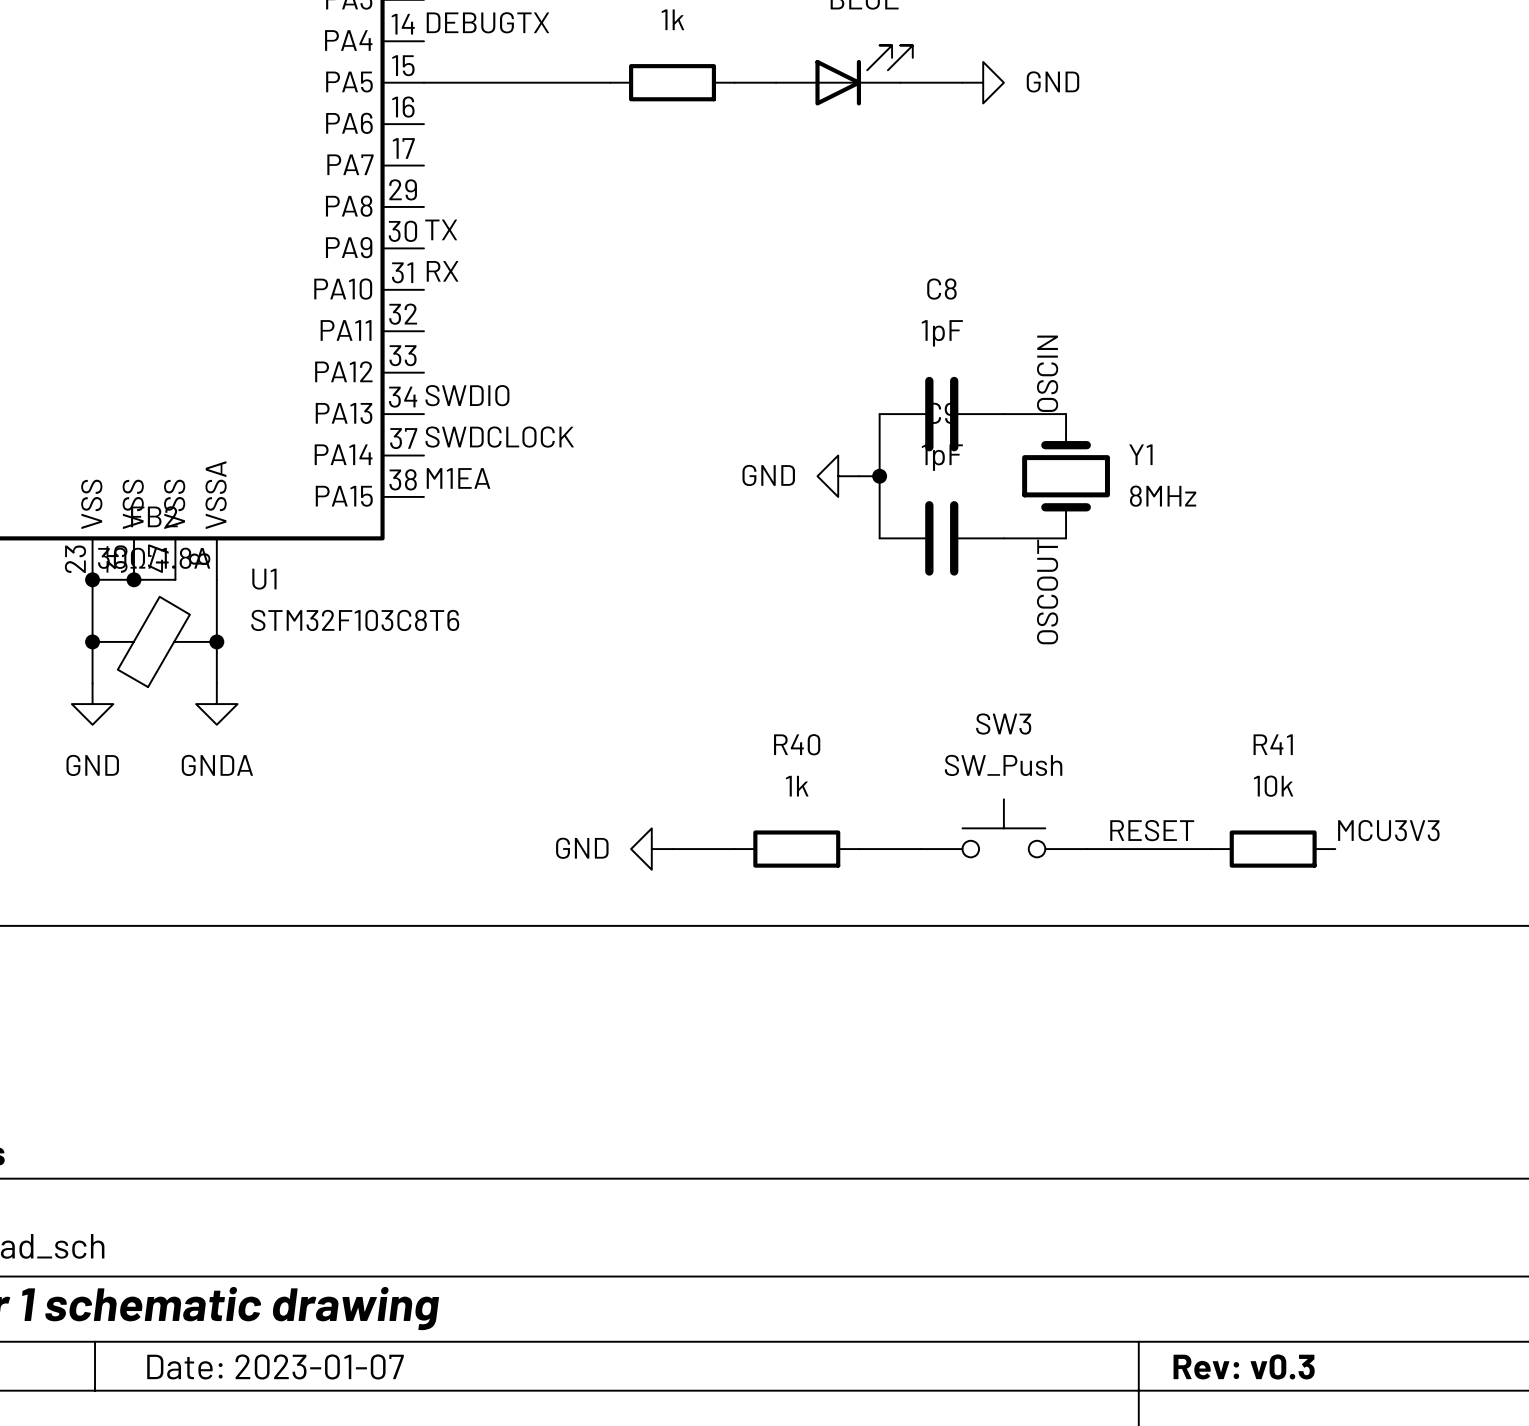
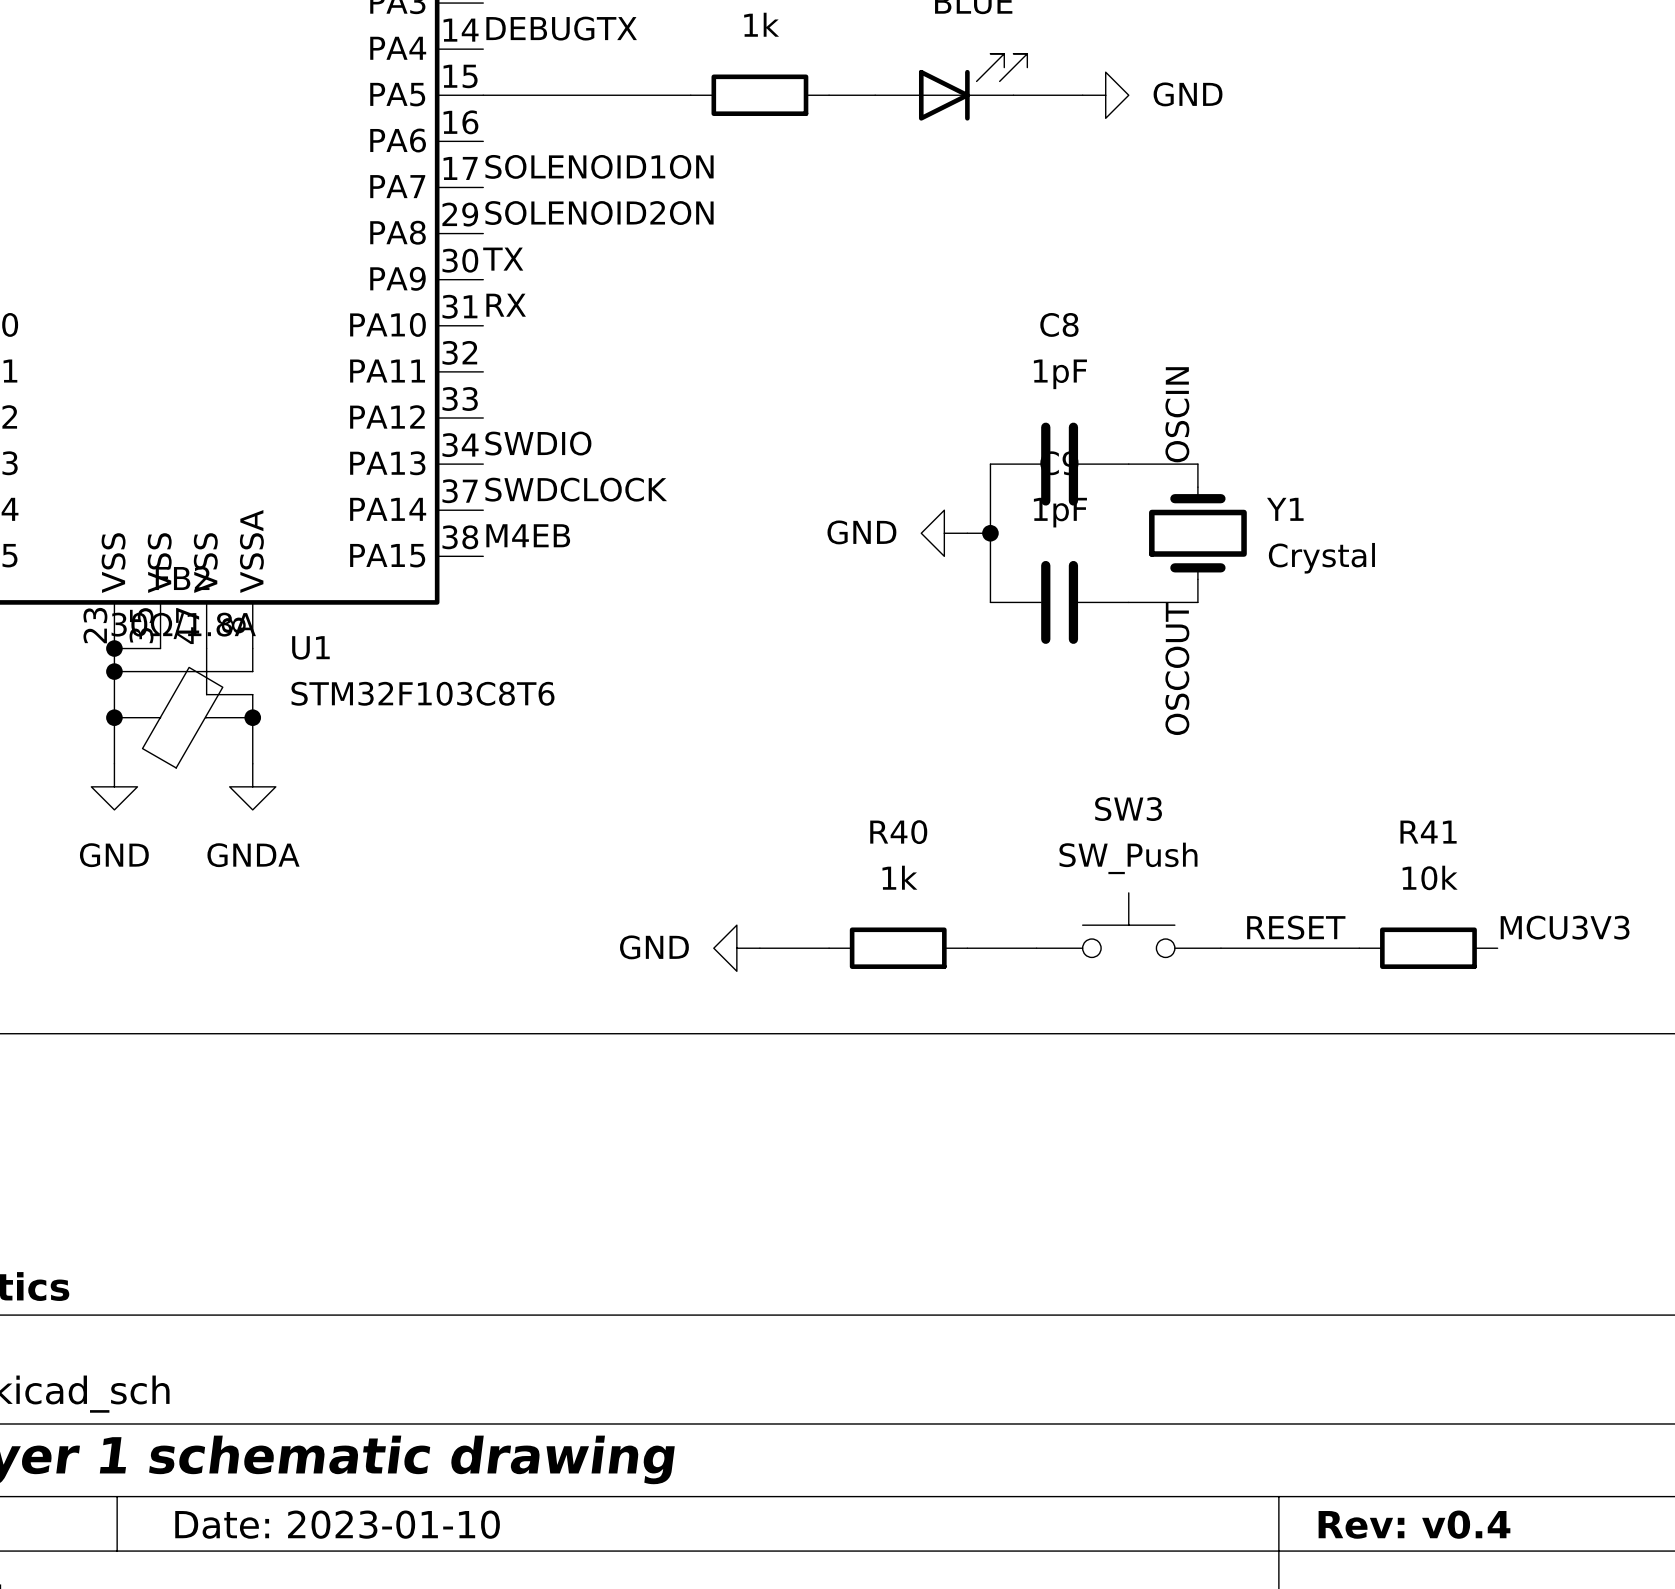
label: none -> SOLENOID1ON (599, 166)
label: none -> SOLENOID2ON (599, 213)
label: M1EA (458, 478) -> M4EB (528, 535)
Y1 value: 8MHz (1163, 496) -> Crystal (1321, 558)
wire: (133, 579) (175, 579) -> none
junction position: (133, 579) -> (114, 671)
wire: none -> (114, 671) (252, 671)
wire: (216, 600) (216, 621) -> (206, 648) (206, 694) (252, 694)
title block: Date: 2023-01-07 (275, 1366) -> Date: 2023-01-10 (337, 1524)
title block: Rev: v0.3 (1244, 1366) -> Rev: v0.4 (1414, 1524)

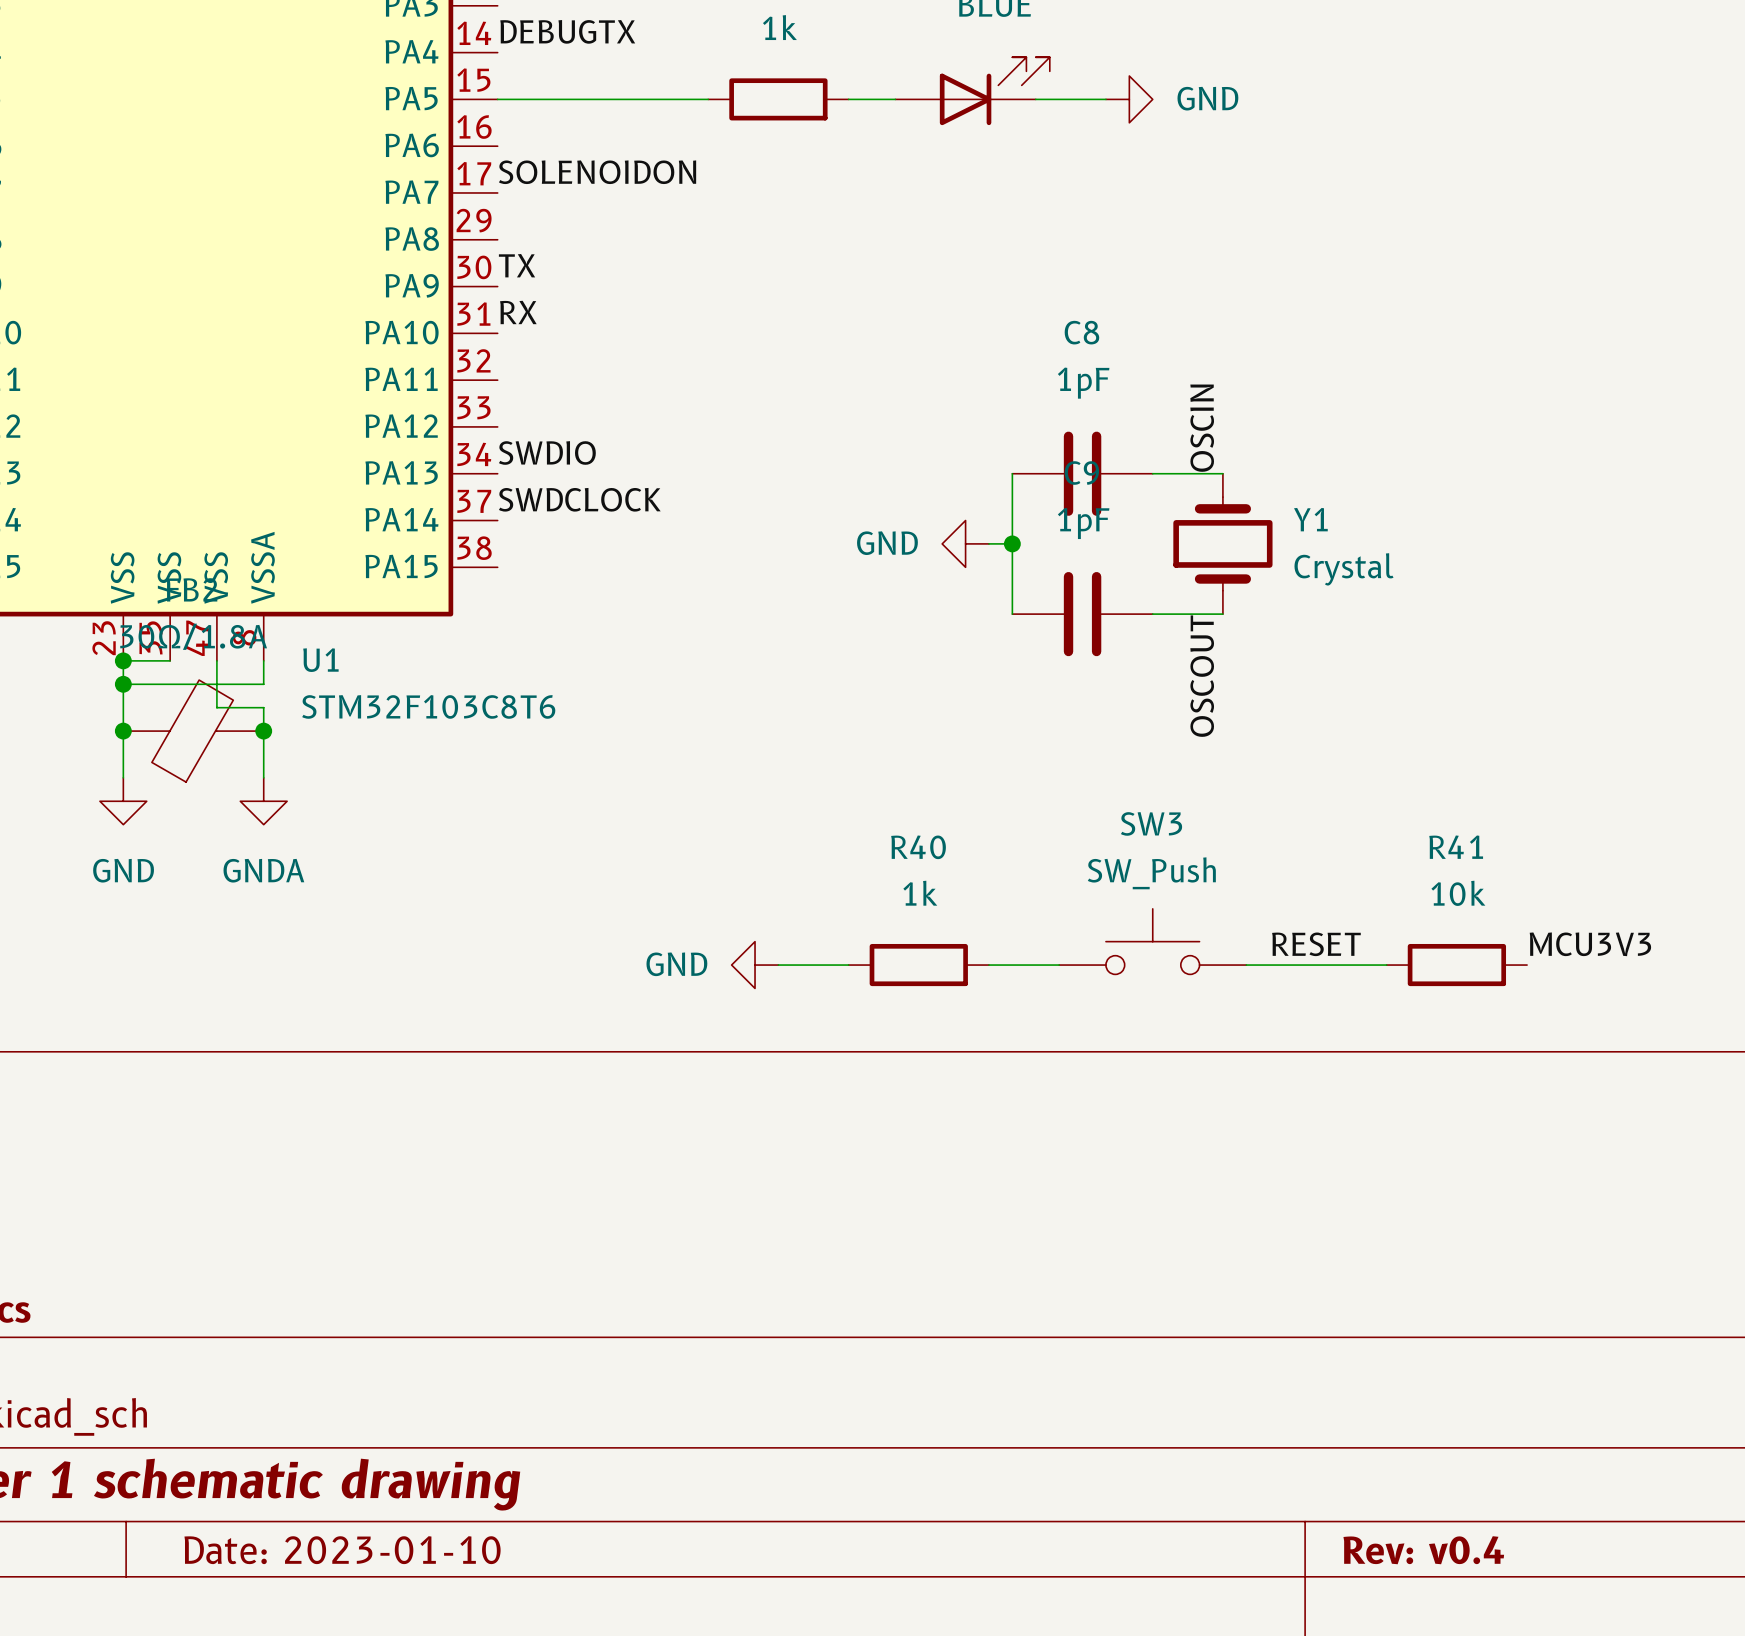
label: SOLENOID1ON (599, 166) -> SOLENOIDON (597, 172)
label: SOLENOID2ON (599, 213) -> none
label: M4EB (528, 535) -> none

